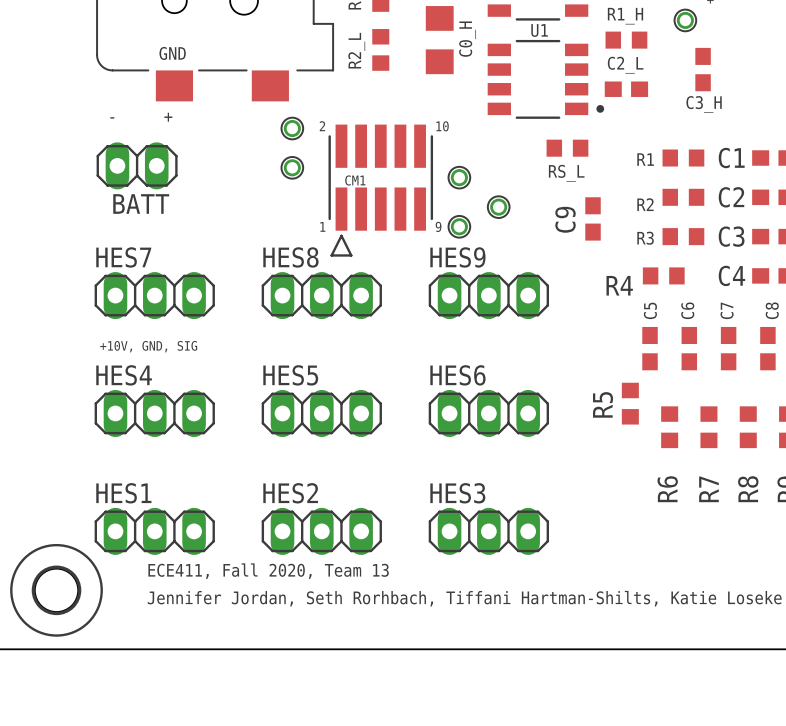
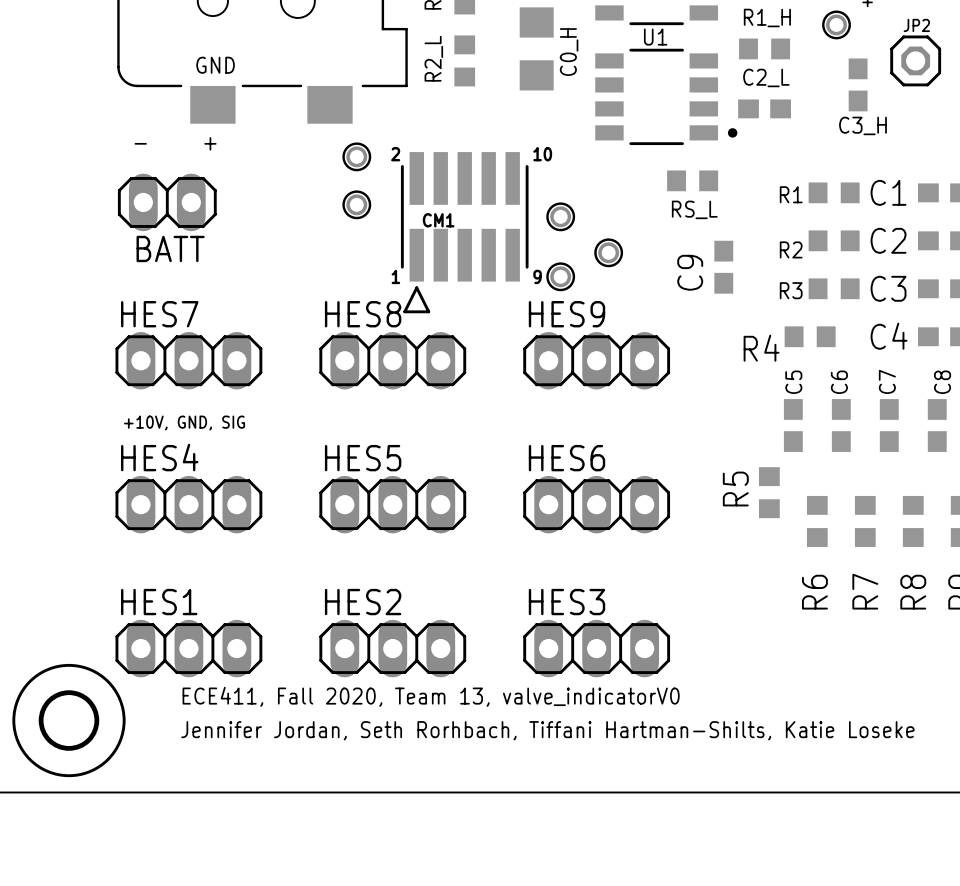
JP2: none -> (915, 60)
text: ECE411, Fall 2020, Team 13 (268, 571) -> ECE411, Fall 2020, Team 13, valve_indicatorV0 (431, 696)

